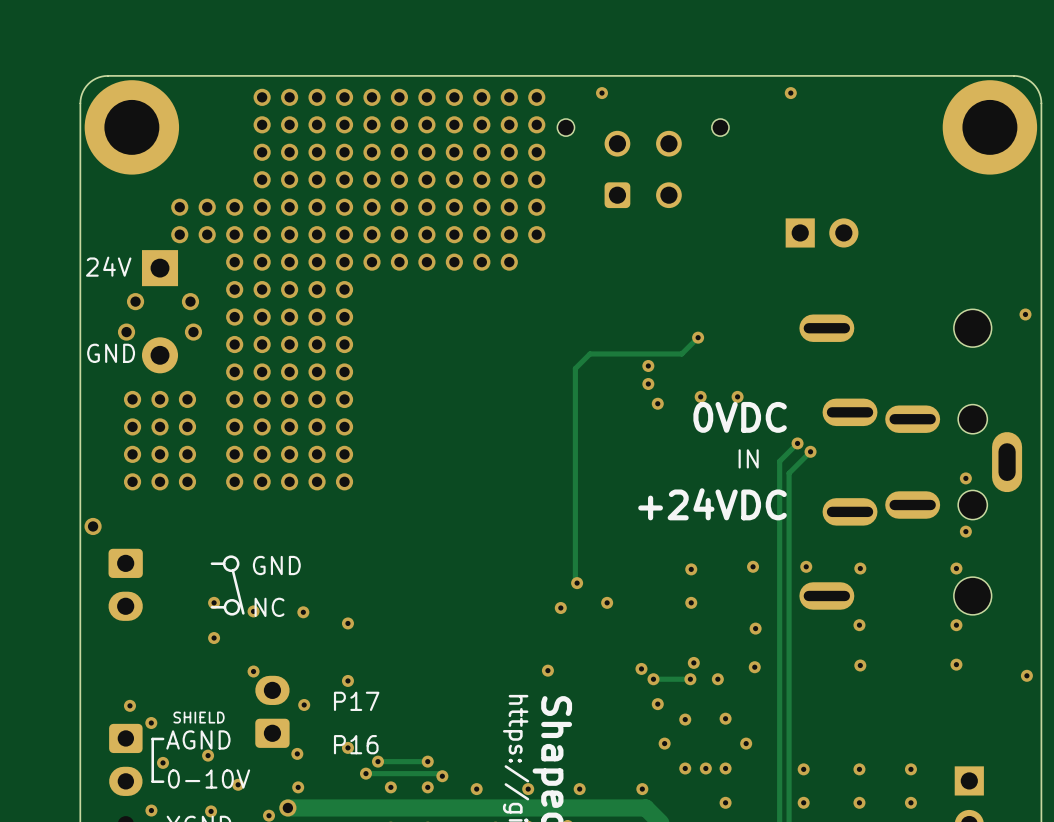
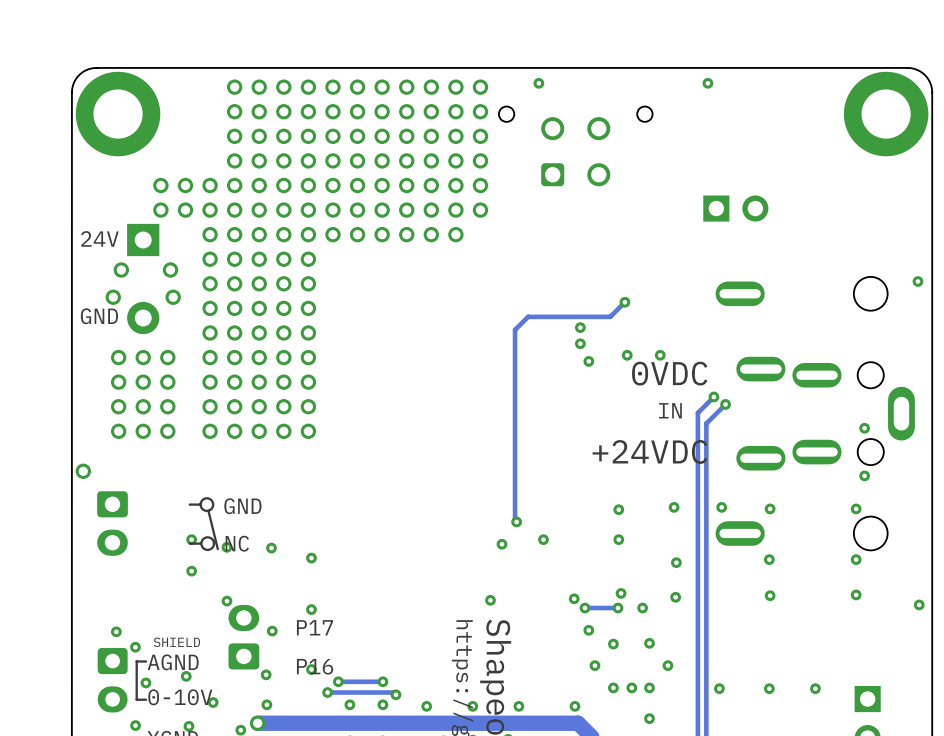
via: (803, 802) -> none
via: (859, 802) -> none
via: (910, 802) -> none

